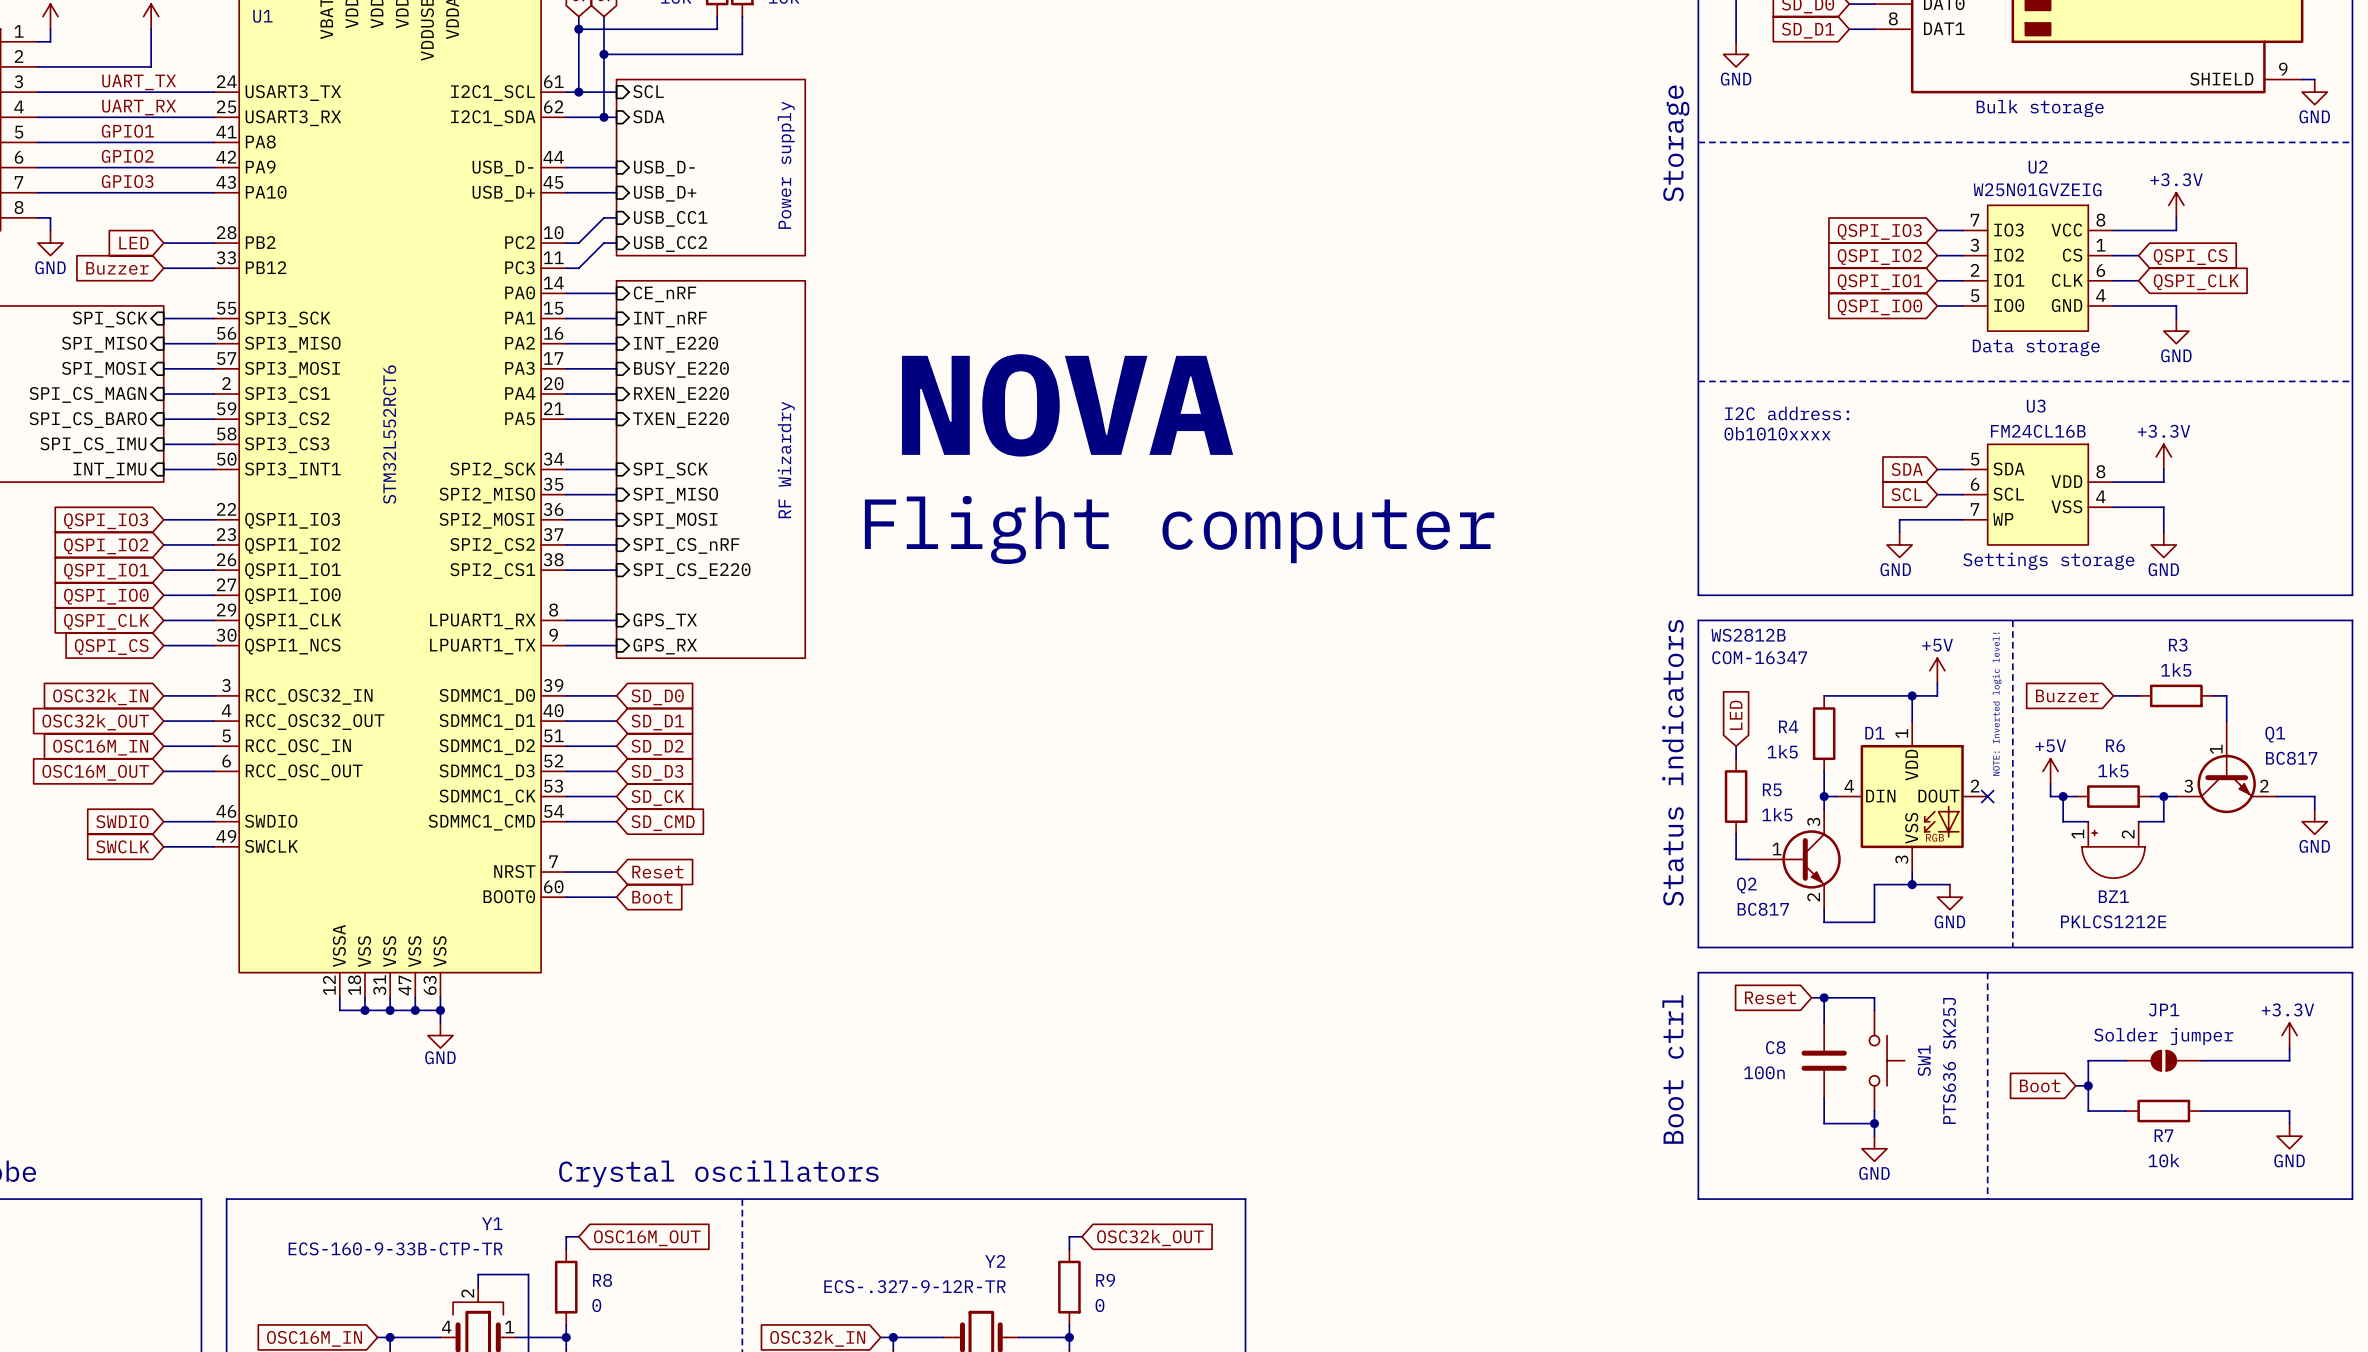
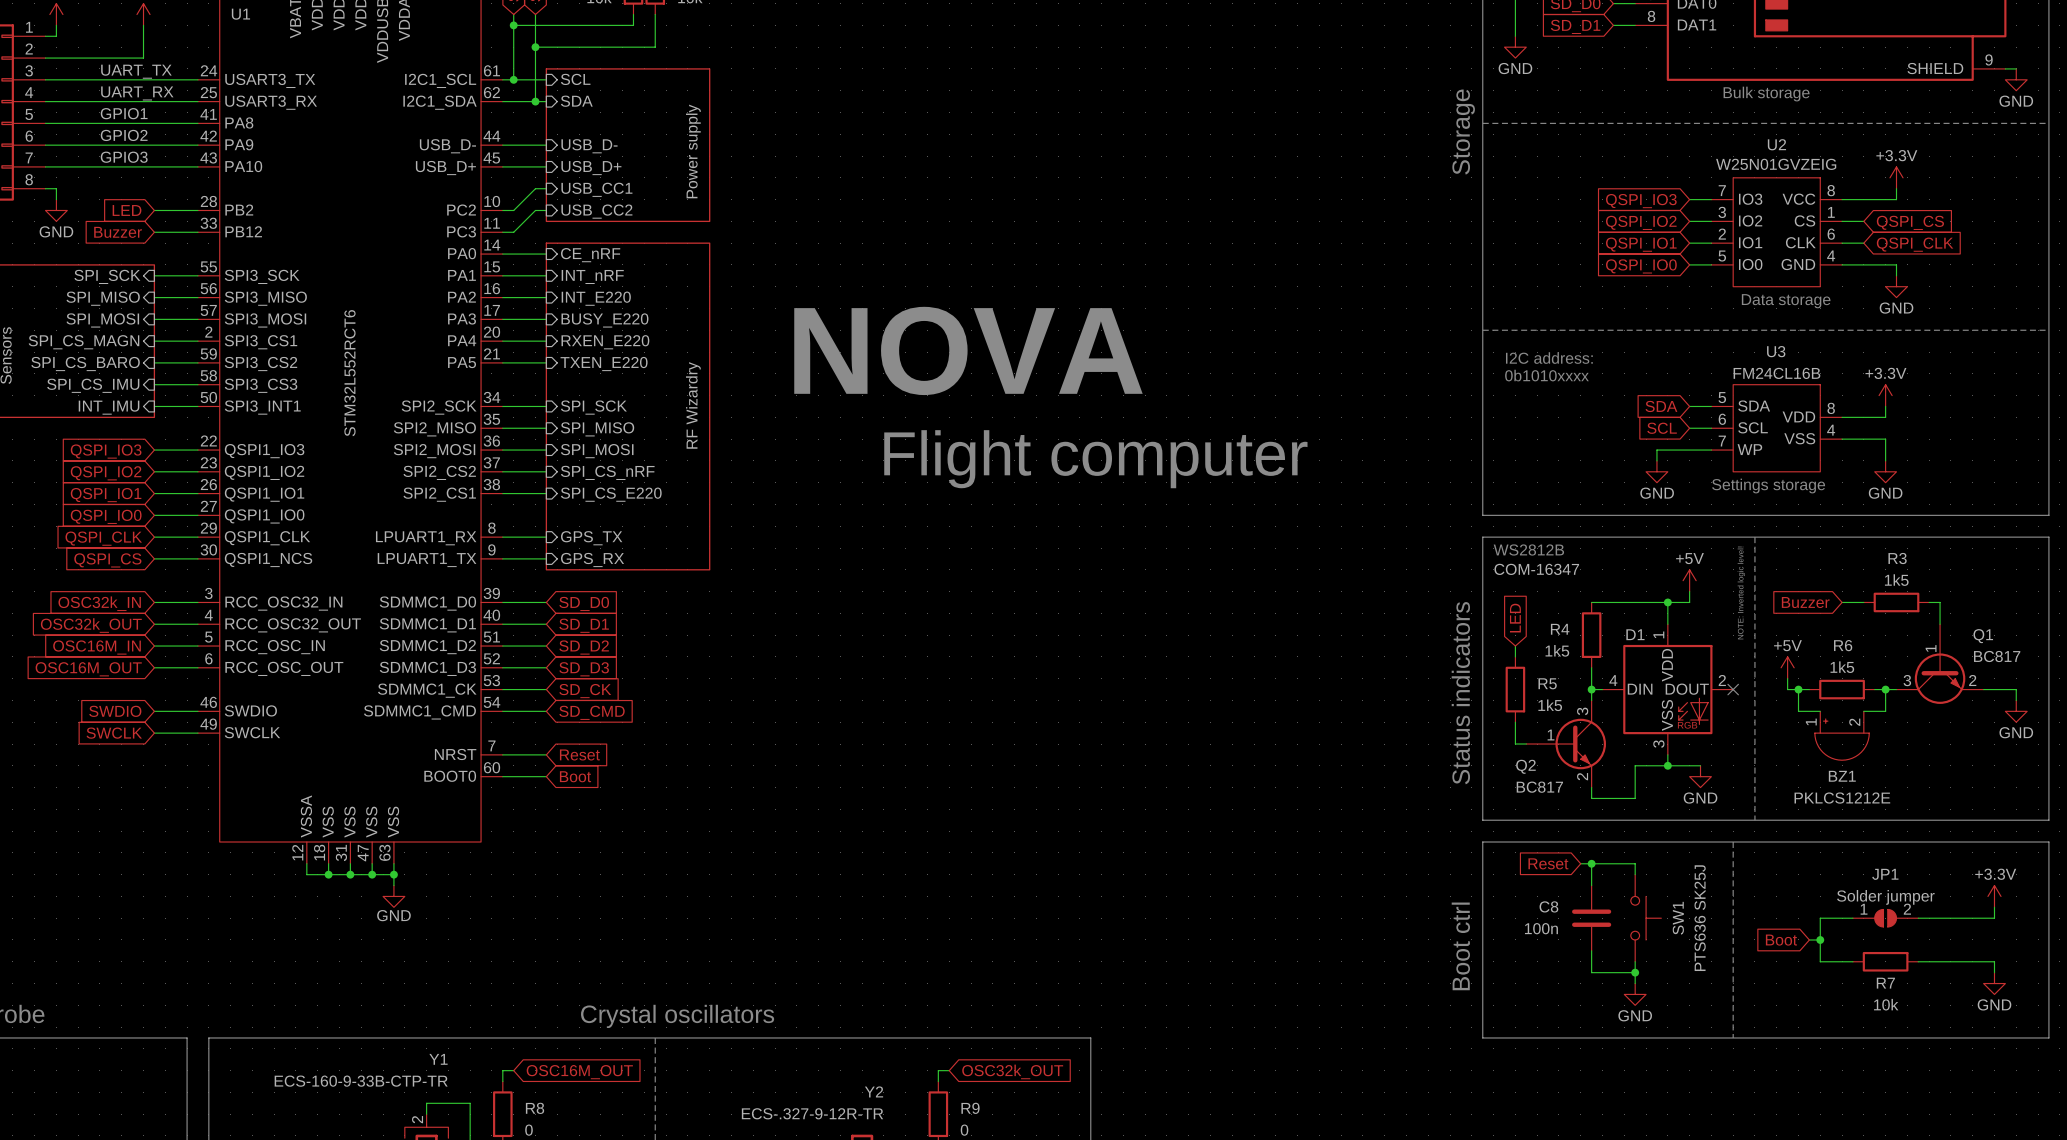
JP1 pin number: none -> 1 (1864, 909)
JP1 pin number: none -> 2 (1907, 909)

